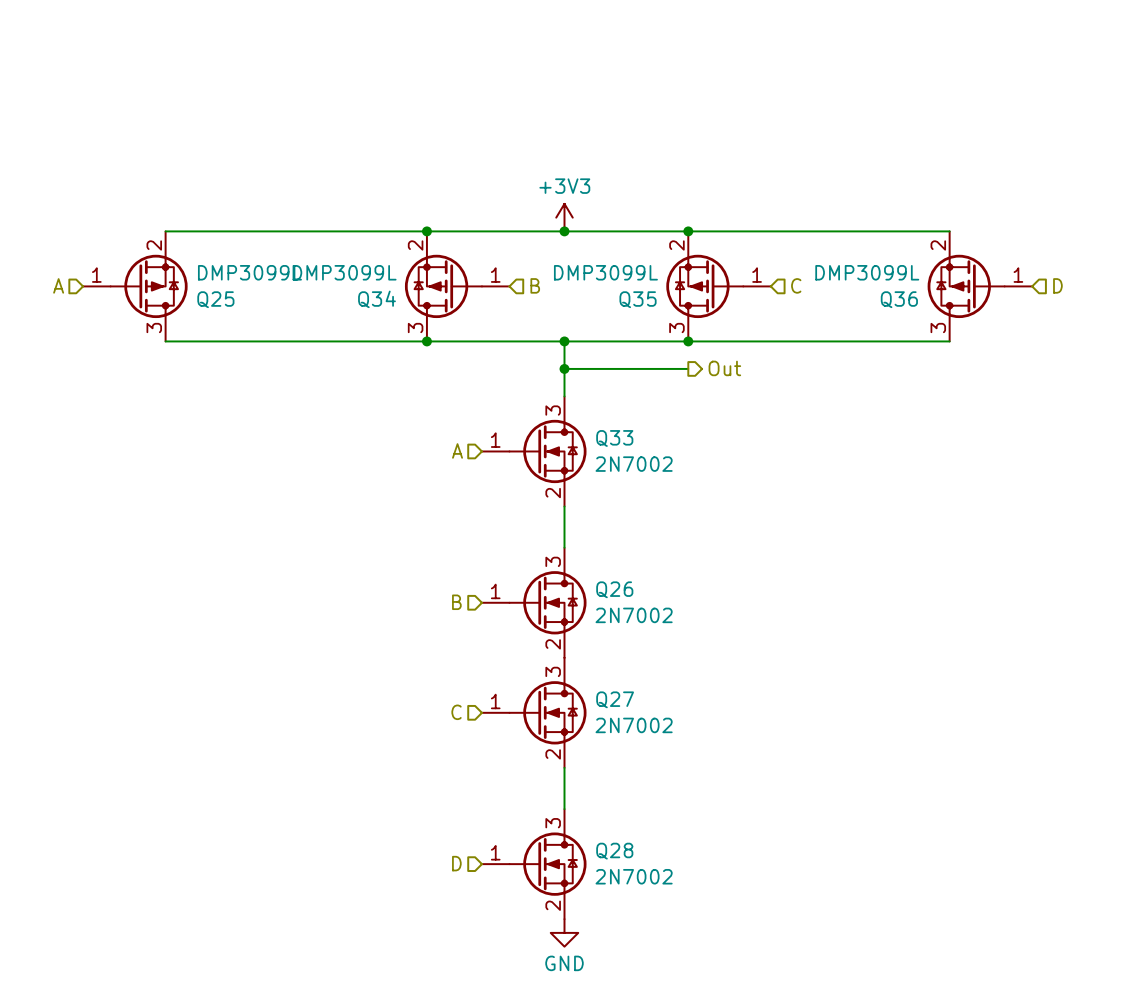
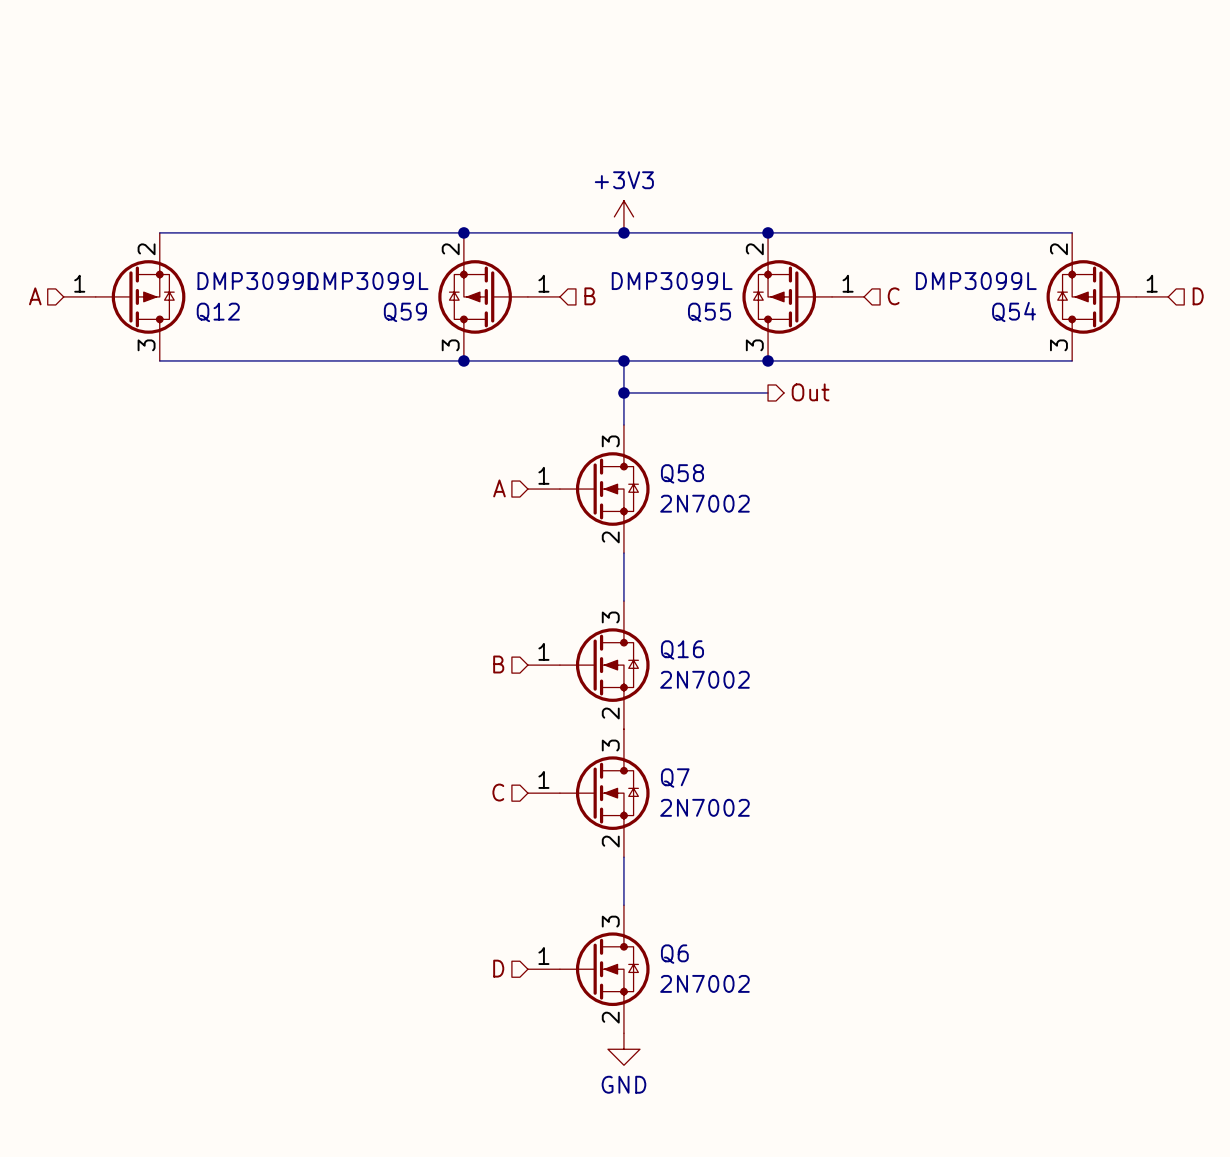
Q25 name: Q25 (215, 299) -> Q12 (218, 312)
Q34 name: Q34 (377, 299) -> Q59 (405, 312)
Q35 name: Q35 (638, 299) -> Q55 (709, 312)
Q36 name: Q36 (899, 299) -> Q54 (1014, 312)
Q33 name: Q33 (614, 438) -> Q58 (682, 473)
Q26 name: Q26 (614, 589) -> Q16 (682, 649)
Q27 name: Q27 (615, 699) -> Q7 (675, 778)
Q28 name: Q28 (614, 851) -> Q6 (674, 954)

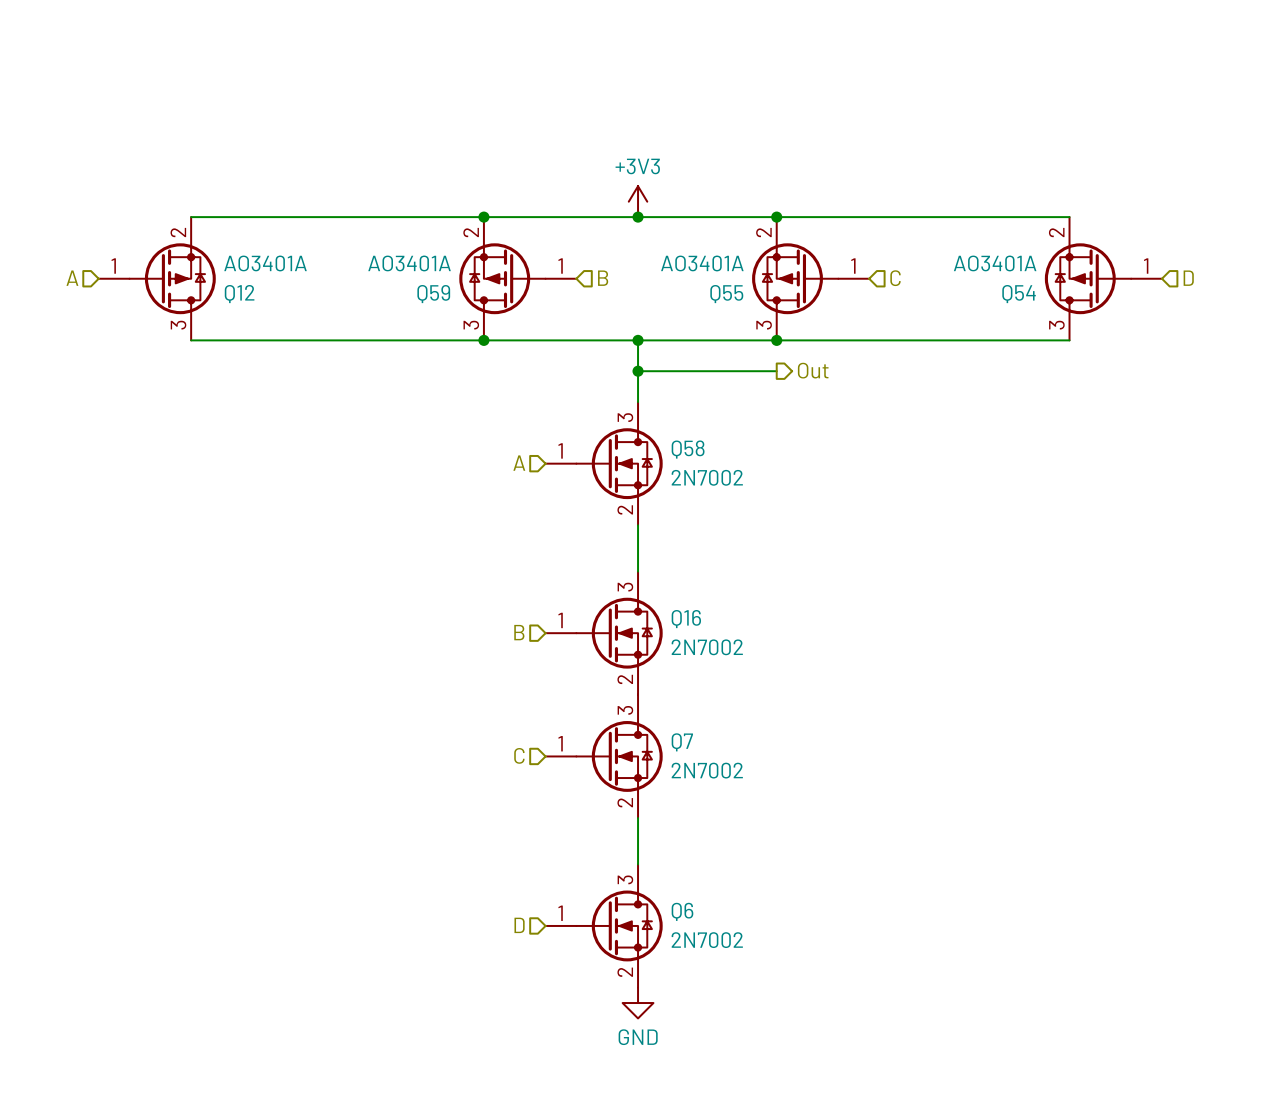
Q12 value: DMP3099L (257, 281) -> AO3401A (265, 263)
Q59 value: DMP3099L (368, 281) -> AO3401A (409, 263)
Q55 value: DMP3099L (672, 281) -> AO3401A (702, 263)
Q54 value: DMP3099L (976, 281) -> AO3401A (995, 263)

